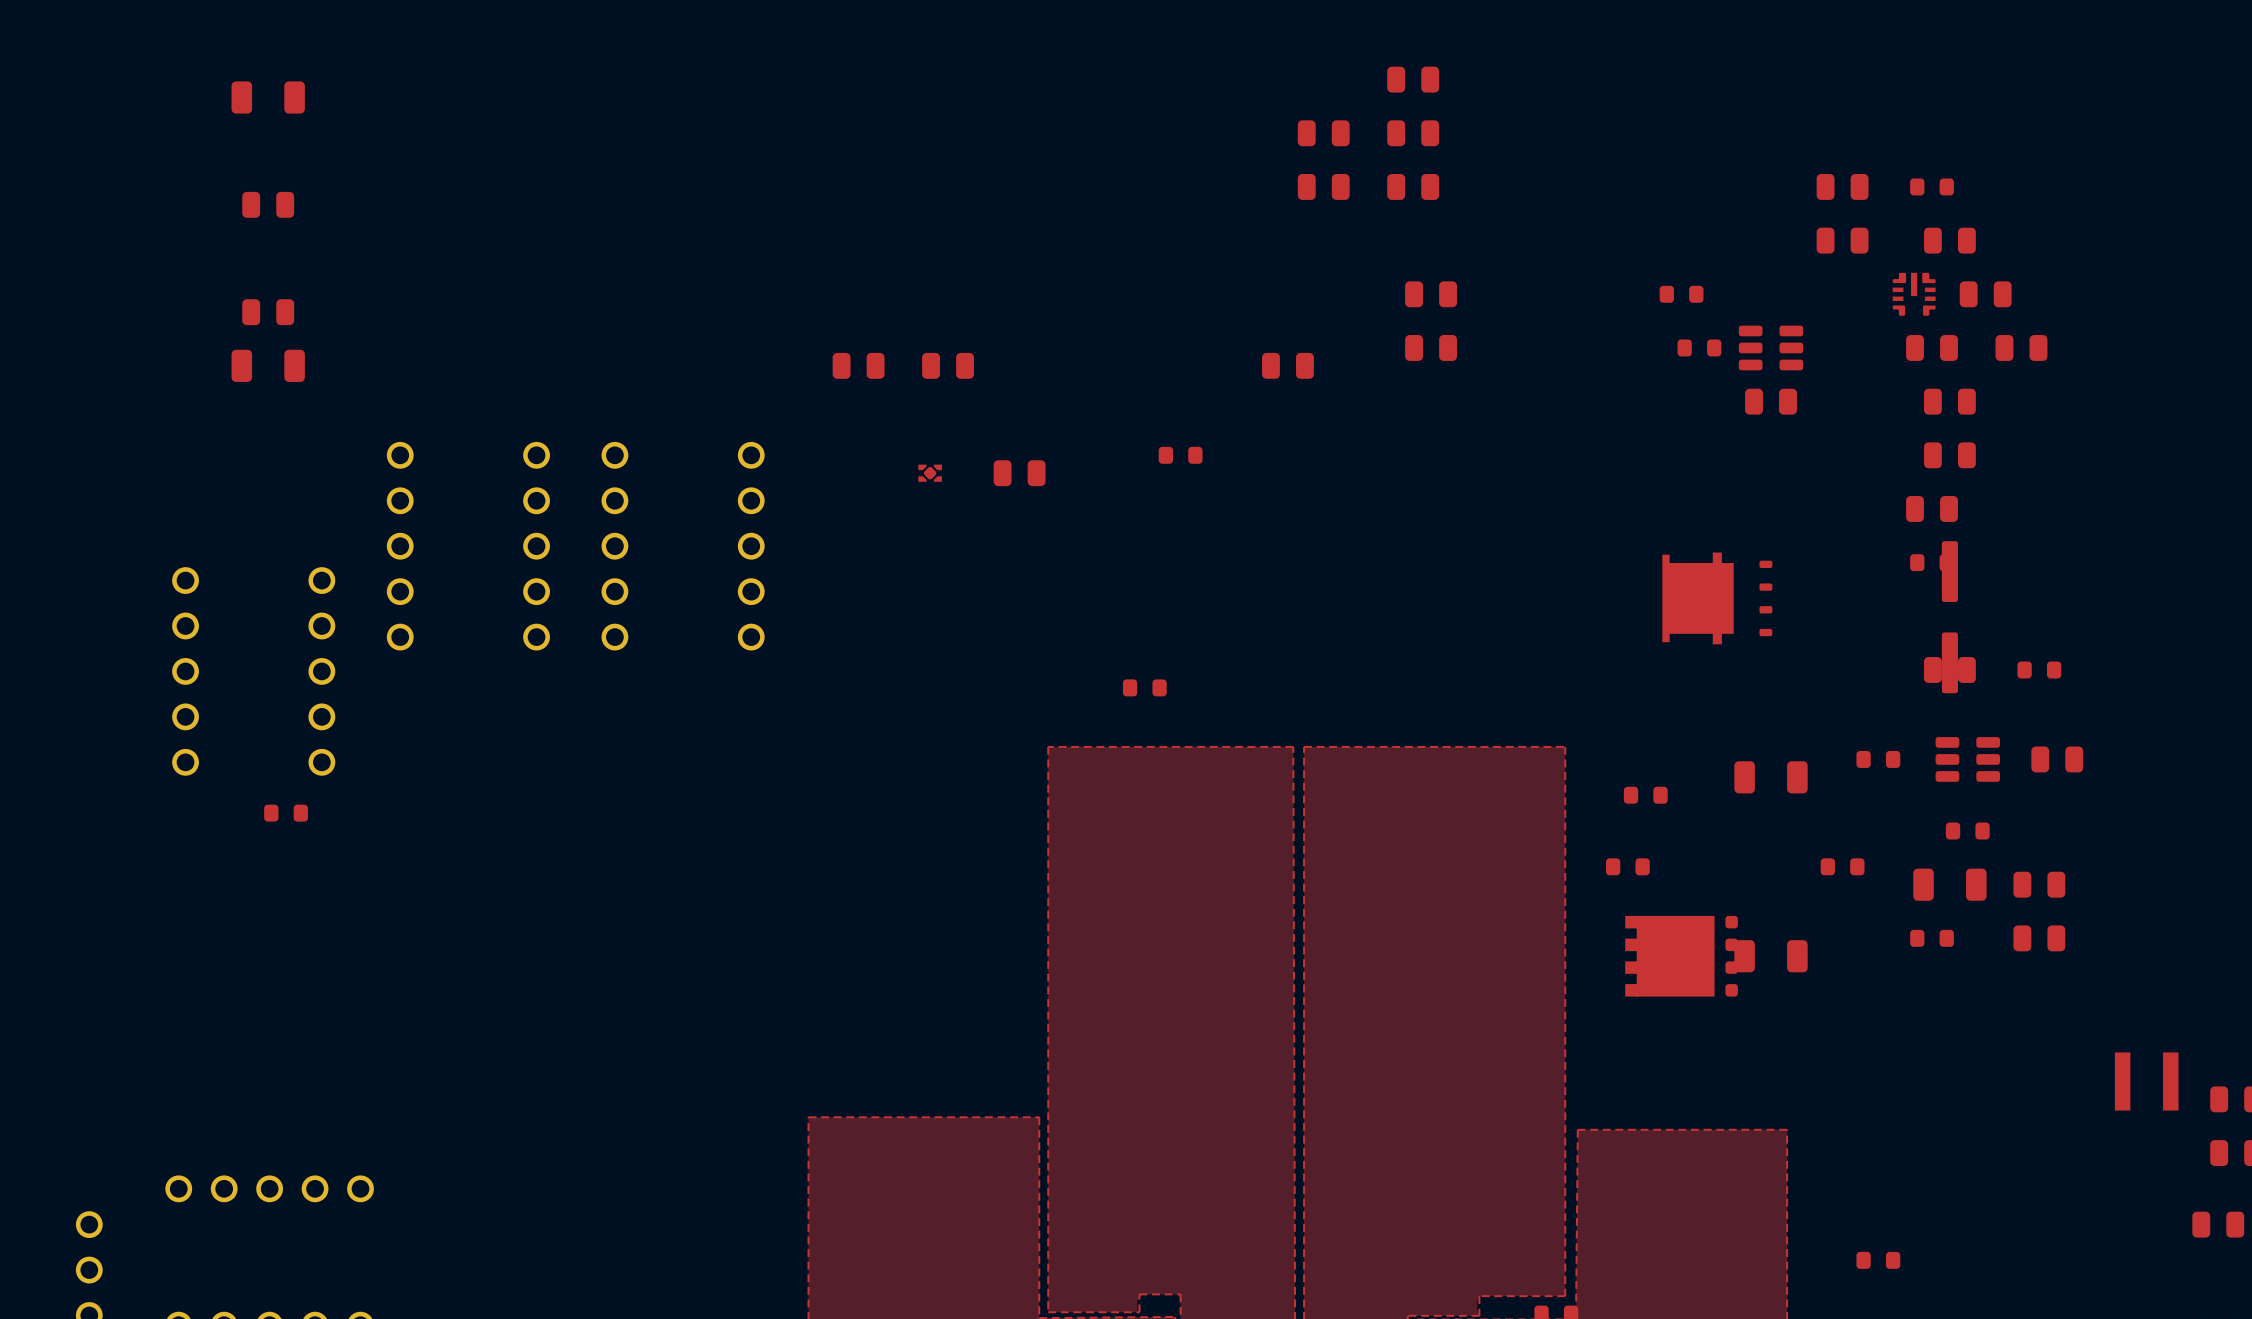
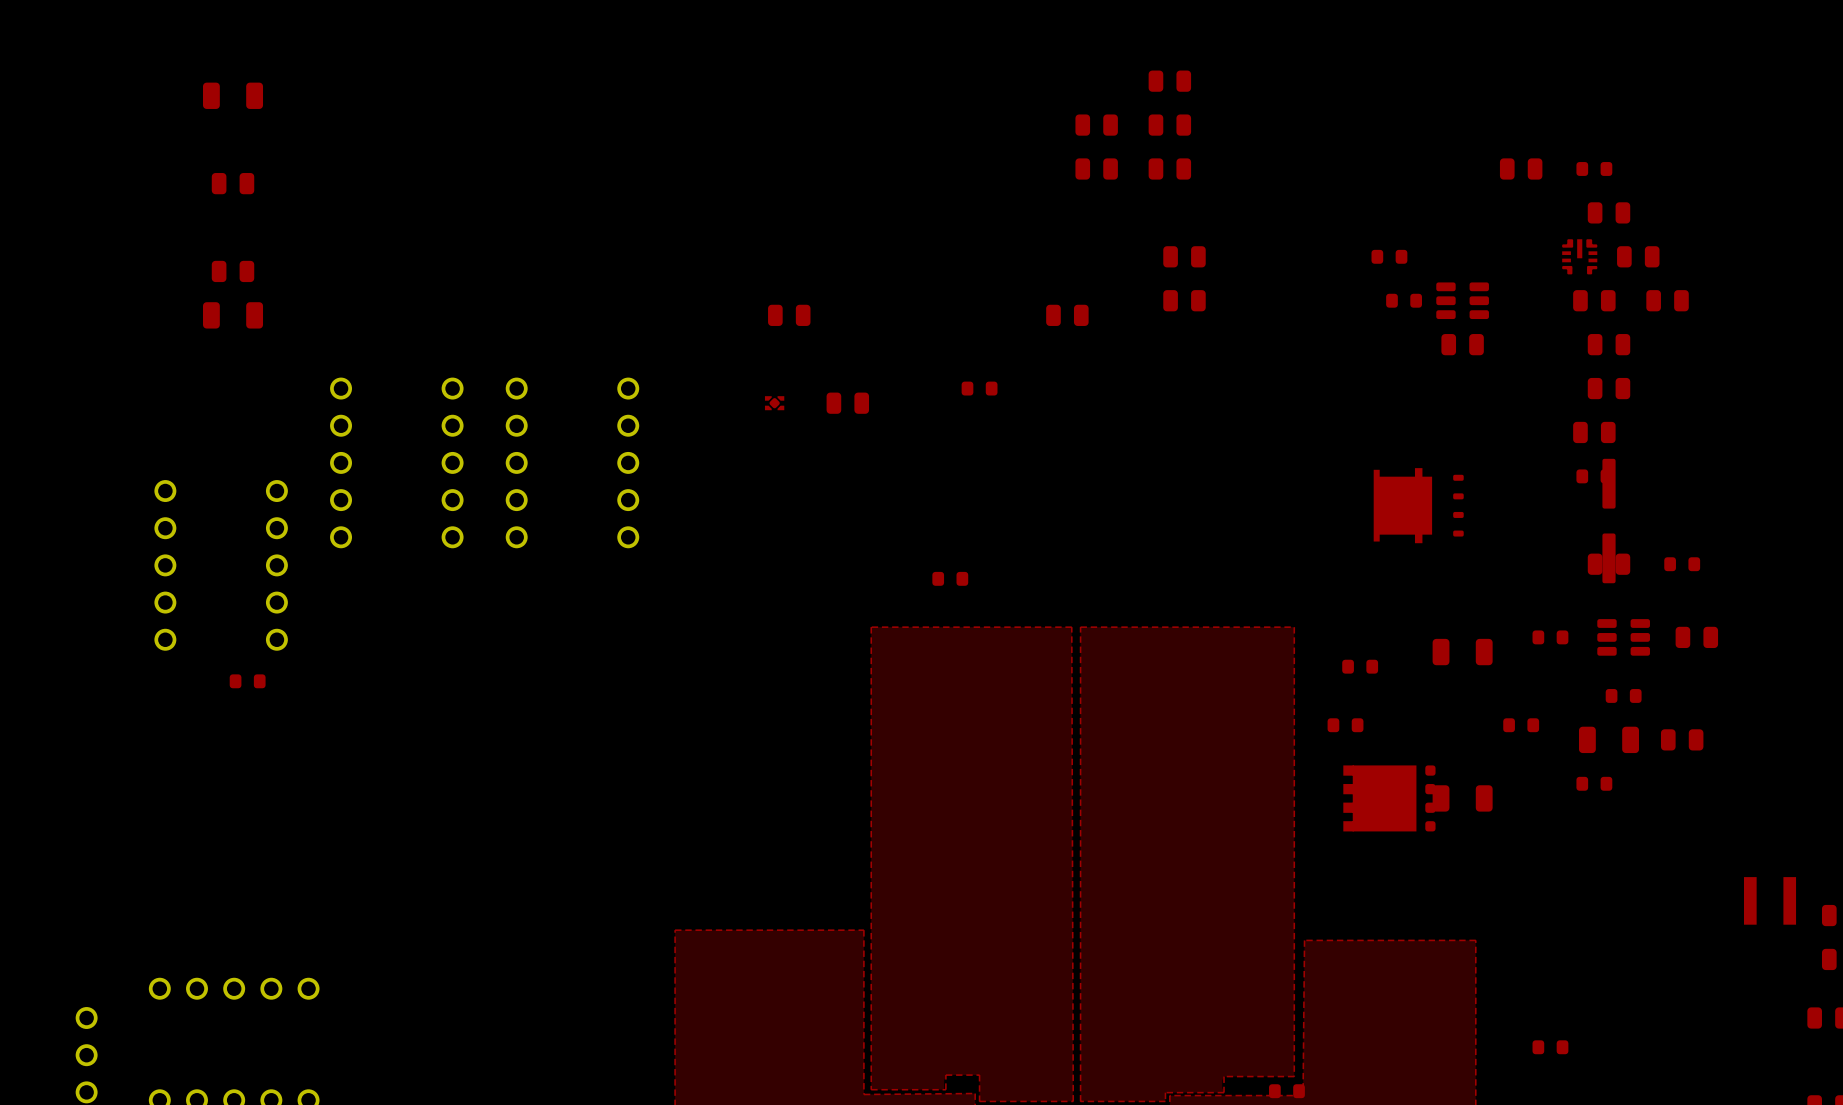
part: (1842, 240) -> none
part: (858, 365) -> none
part: (2039, 938) -> none

